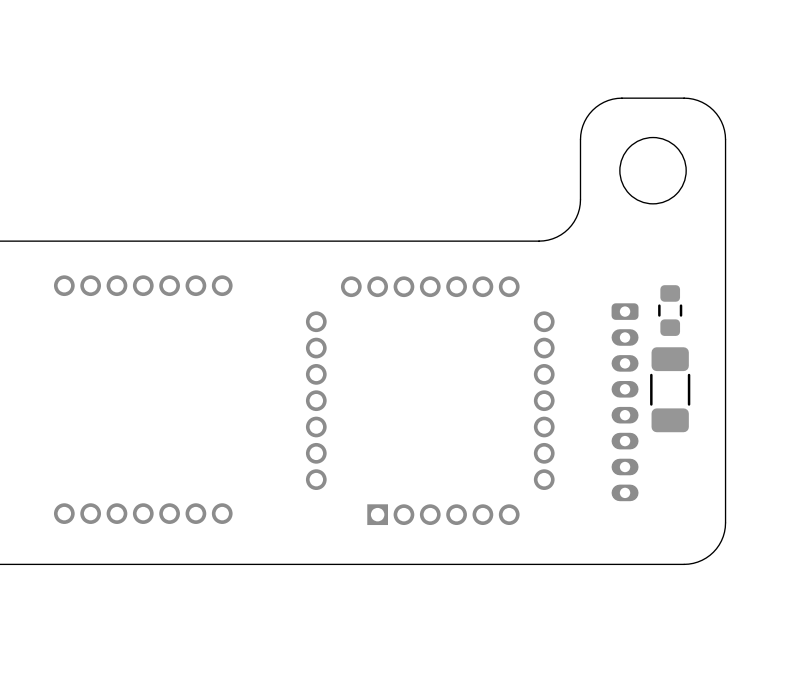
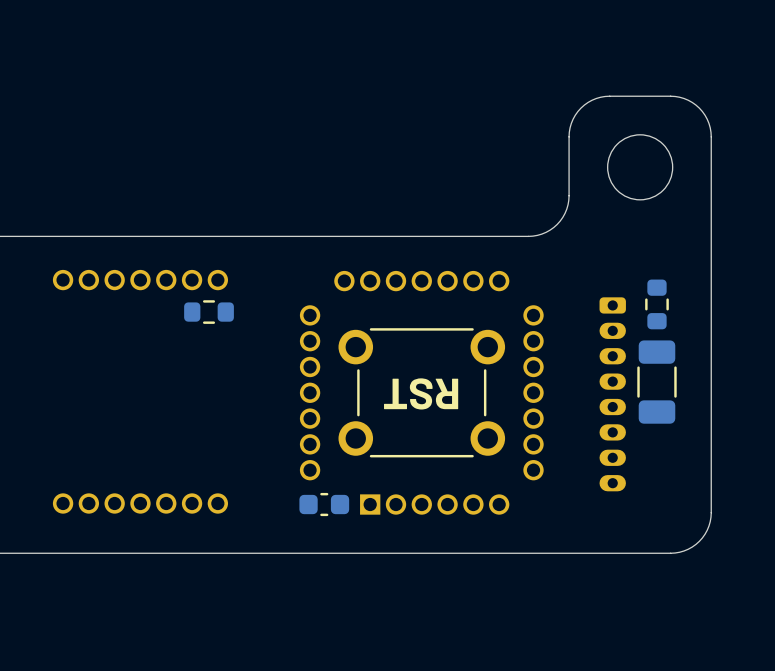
part: none -> (209, 312)
part: none -> (421, 392)
text: none -> RST (421, 393)
part: none -> (324, 504)

